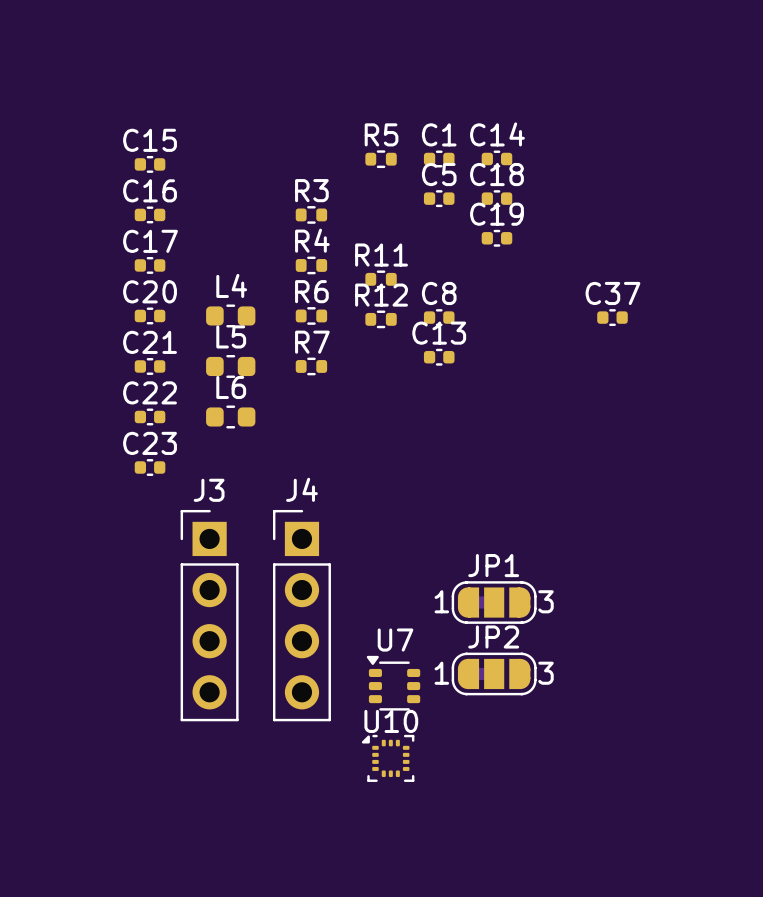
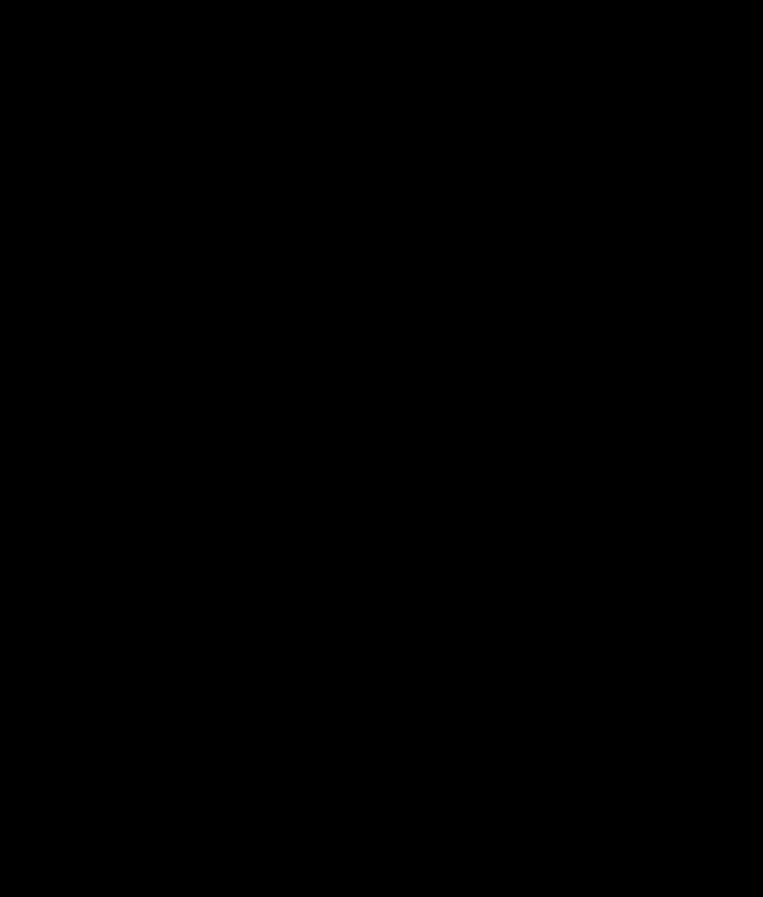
C1: (439, 158) -> none
C14: (496, 158) -> none
R5: (381, 159) -> none
C15: (150, 164) -> none
C5: (439, 198) -> none
C18: (496, 198) -> none
C16: (150, 214) -> none
R3: (311, 214) -> none
C19: (496, 238) -> none
C17: (150, 265) -> none
R4: (311, 265) -> none
R11: (381, 279) -> none
C20: (150, 315) -> none
L4: (230, 315) -> none
R6: (311, 315) -> none
C8: (439, 317) -> none
C37: (612, 317) -> none
R12: (381, 319) -> none
C13: (439, 357) -> none
C21: (150, 366) -> none
L5: (230, 366) -> none
R7: (311, 366) -> none
C22: (150, 416) -> none
L6: (230, 416) -> none
C23: (150, 467) -> none
JP1: (494, 602) -> none
J3: (209, 615) -> none
J4: (301, 615) -> none
JP2: (494, 673) -> none
U7: (393, 683) -> none
U10: (388, 758) -> none

